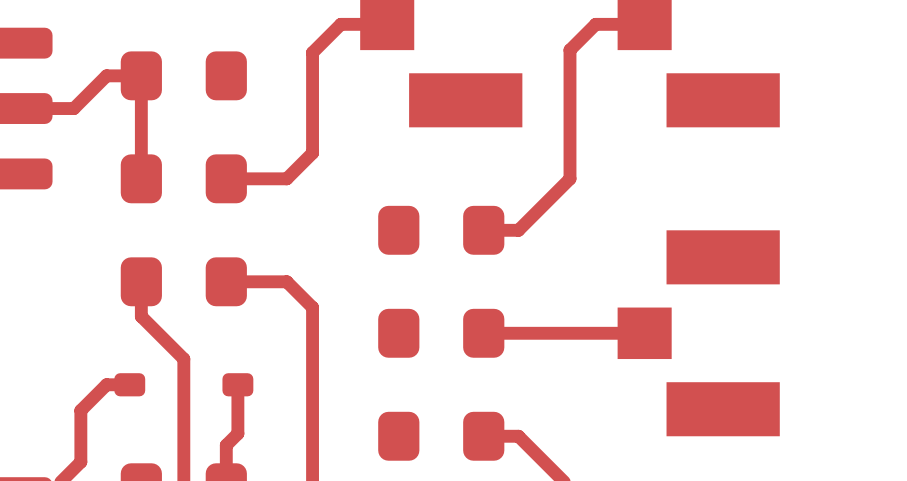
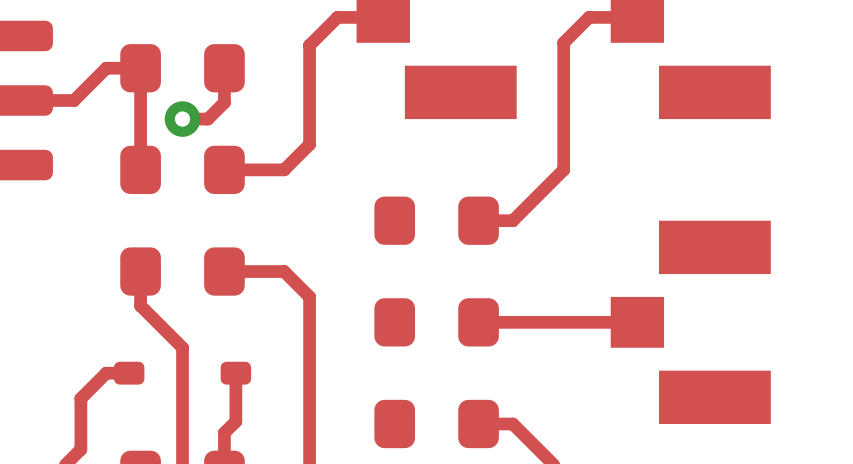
top track: none -> (224, 68) (224, 102) (207, 119) (182, 119)
via: none -> (182, 119)

